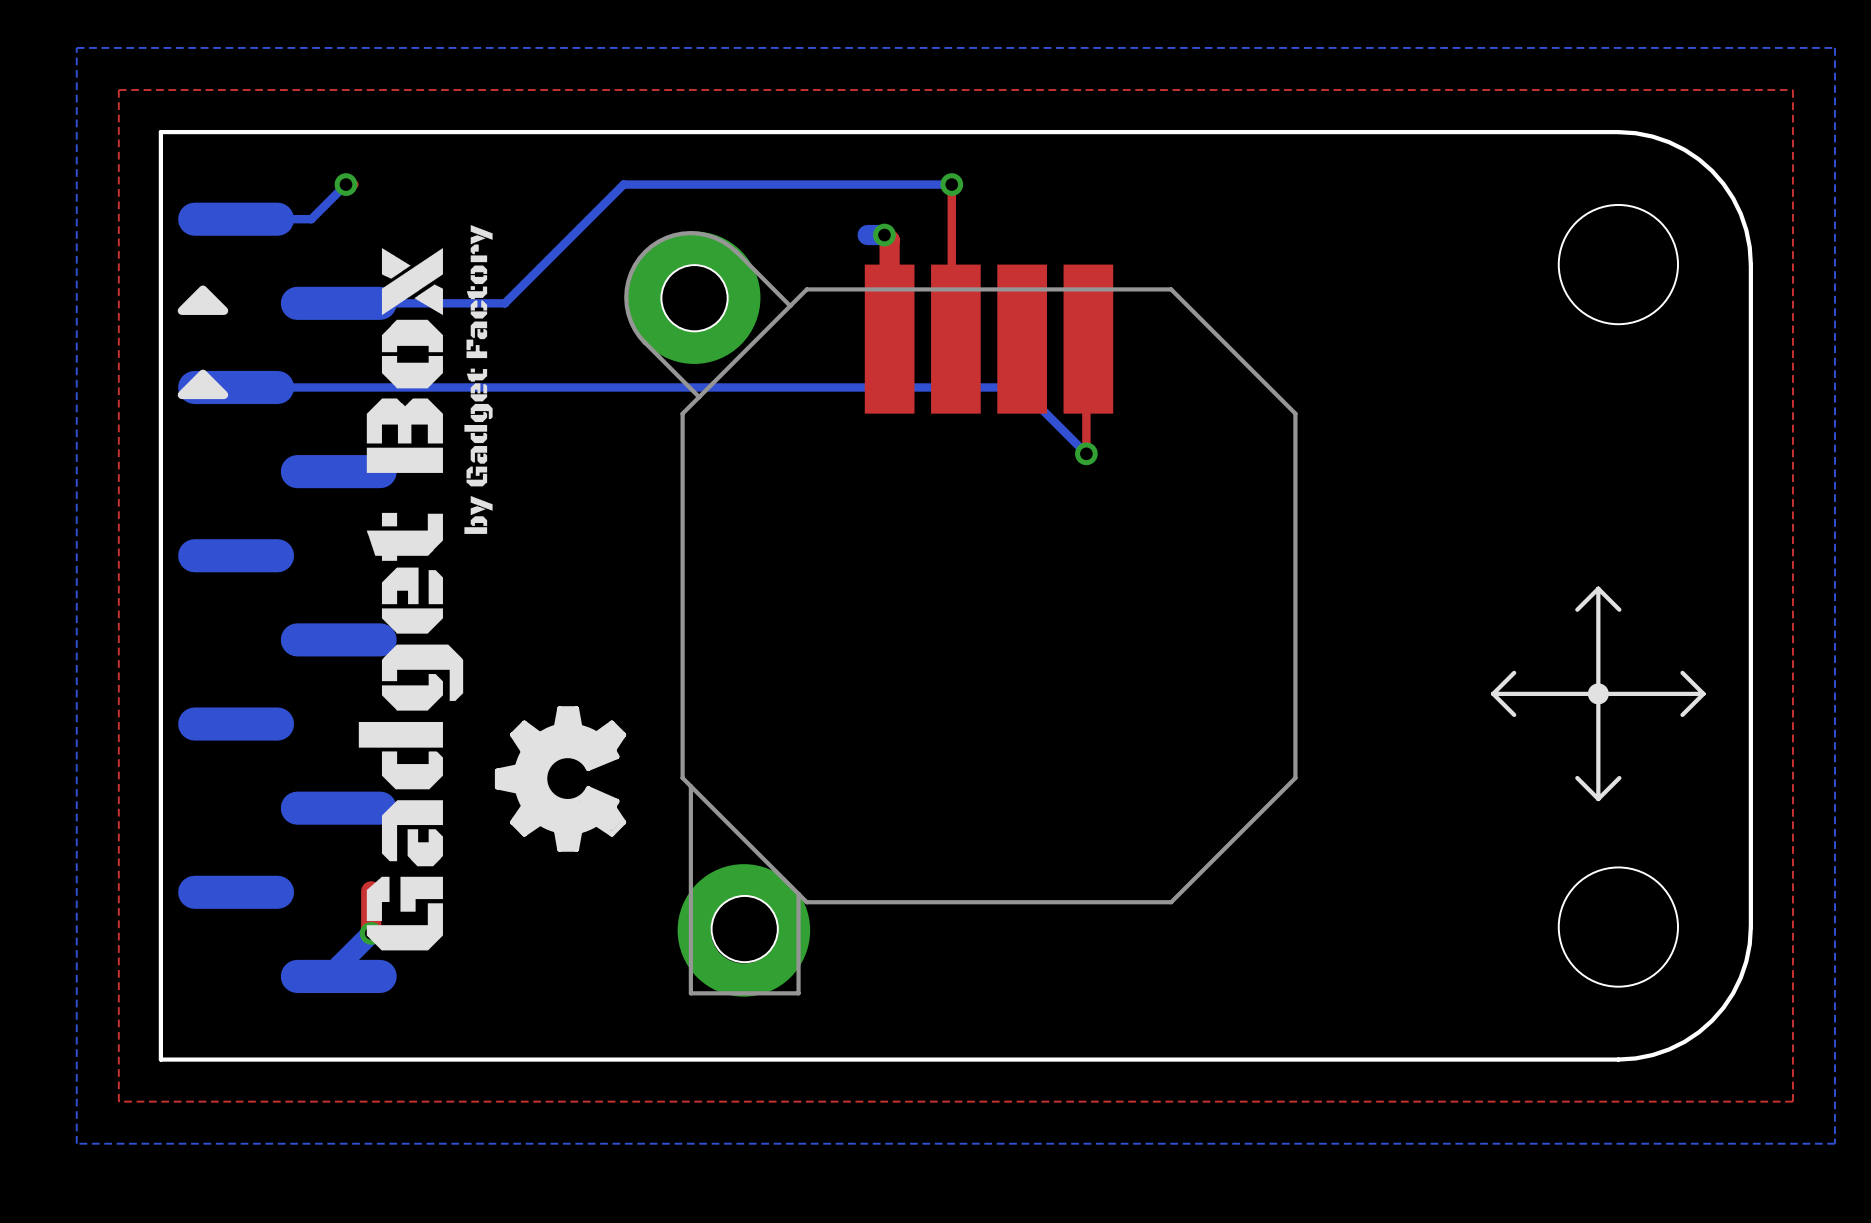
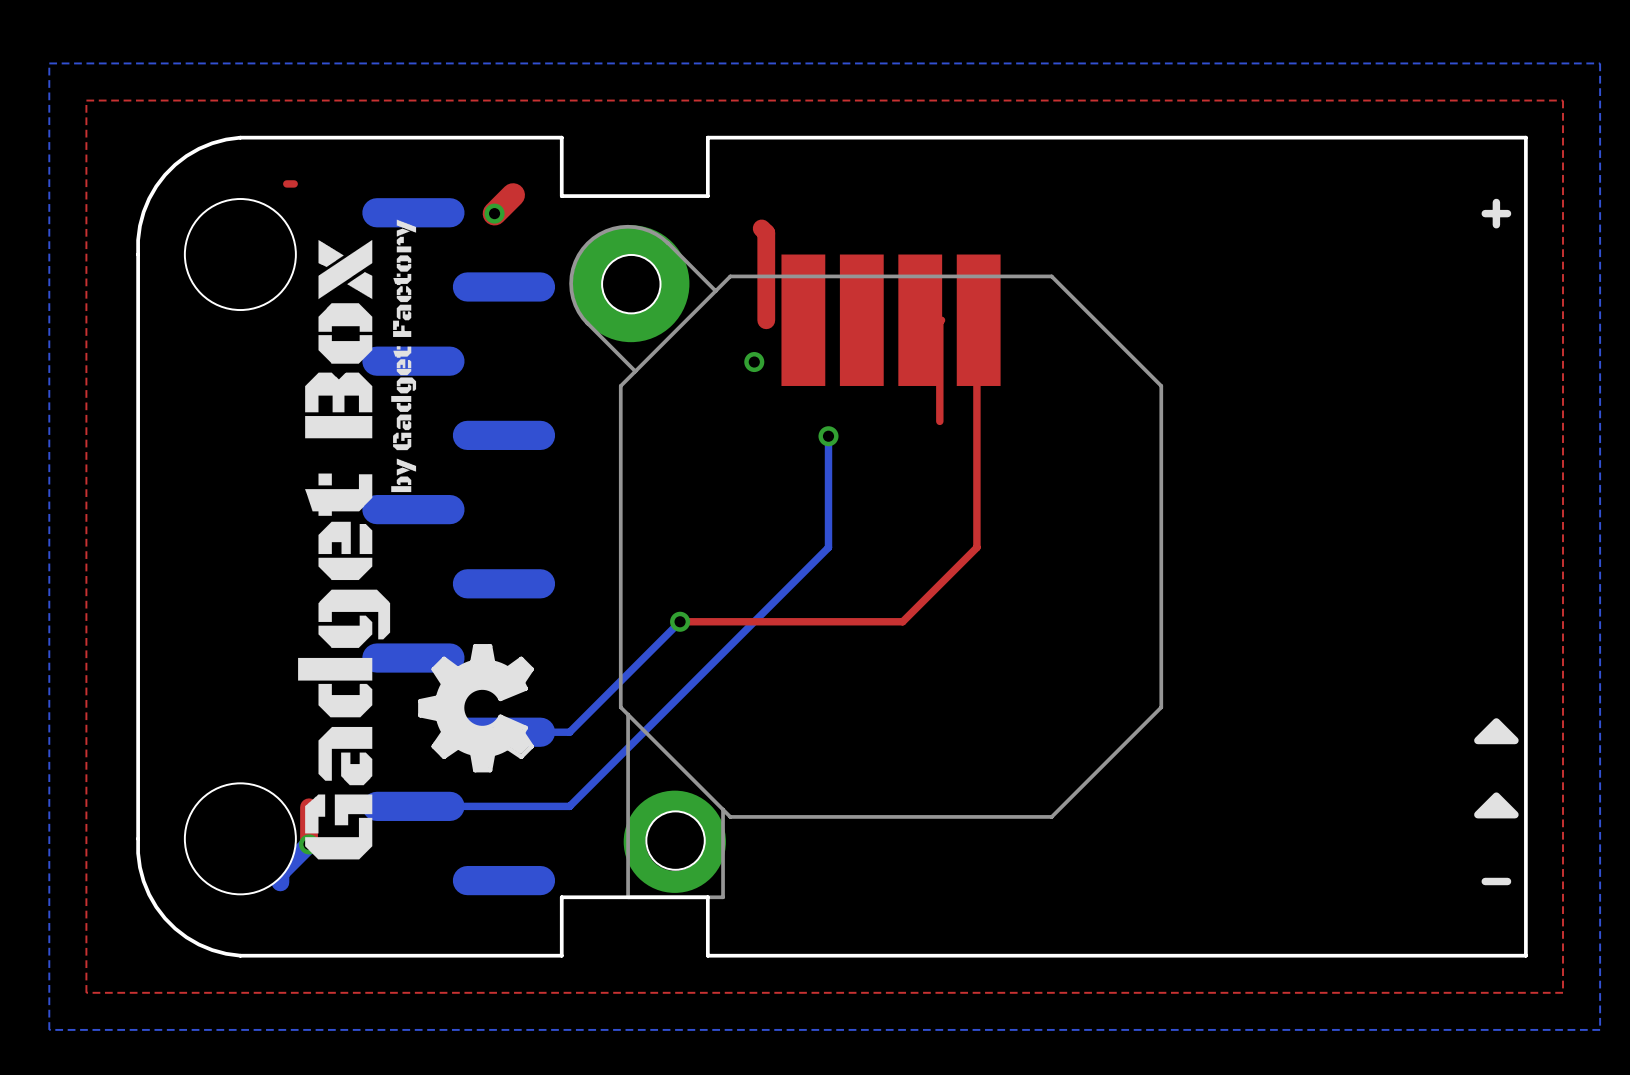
part footprint: [158, 129, 1753, 1062] -> [136, 135, 1528, 958]
bottom track: (345, 184) (311, 219) (236, 219) -> none
via: (345, 184) -> none
bottom track: (951, 184) (623, 184) (504, 303) (338, 303) -> none
top track: (951, 184) (951, 335) (955, 339) -> none
via: (951, 184) -> none
top track: none -> (513, 195) (494, 213)
line: none -> (1496, 202) (1496, 224)
via: none -> (494, 213)
line: none -> (1485, 213) (1507, 213)
bottom track: (867, 235) (884, 235) -> none
via: (884, 235) -> none
drawing: [177, 285, 229, 315] -> none
via position: (694, 297) -> (631, 283)
top track: none -> (978, 320) (976, 322) (976, 547) (902, 621) (680, 621)
drawing: [177, 369, 229, 400] -> none
via: none -> (754, 362)
bottom track: (236, 387) (1020, 387) (1086, 453) -> none
via: (1086, 453) -> none
bottom track: none -> (828, 436) (828, 547) (569, 806) (413, 806)
via: none -> (828, 436)
line: (1598, 588) (1598, 799) -> none
line: (1598, 588) (1577, 609) -> none
line: (1598, 588) (1619, 609) -> none
part position: (960, 613) -> (866, 562)
line: (1514, 672) (1493, 693) -> none
line: (1682, 672) (1703, 693) -> none
bottom track: none -> (680, 621) (569, 732) (503, 732)
via: none -> (680, 621)
drawing: [1587, 683, 1609, 705] -> none
line: (1493, 693) (1514, 714) -> none
line: (1493, 693) (1703, 693) -> none
line: (1703, 693) (1682, 714) -> none
line: (1577, 778) (1598, 799) -> none
line: (1619, 778) (1598, 799) -> none
drawing: none -> [1474, 718, 1519, 745]
drawing: none -> [1474, 792, 1519, 819]
via: (743, 930) -> none
via: none -> (674, 841)
line: none -> (1485, 881) (1507, 881)

